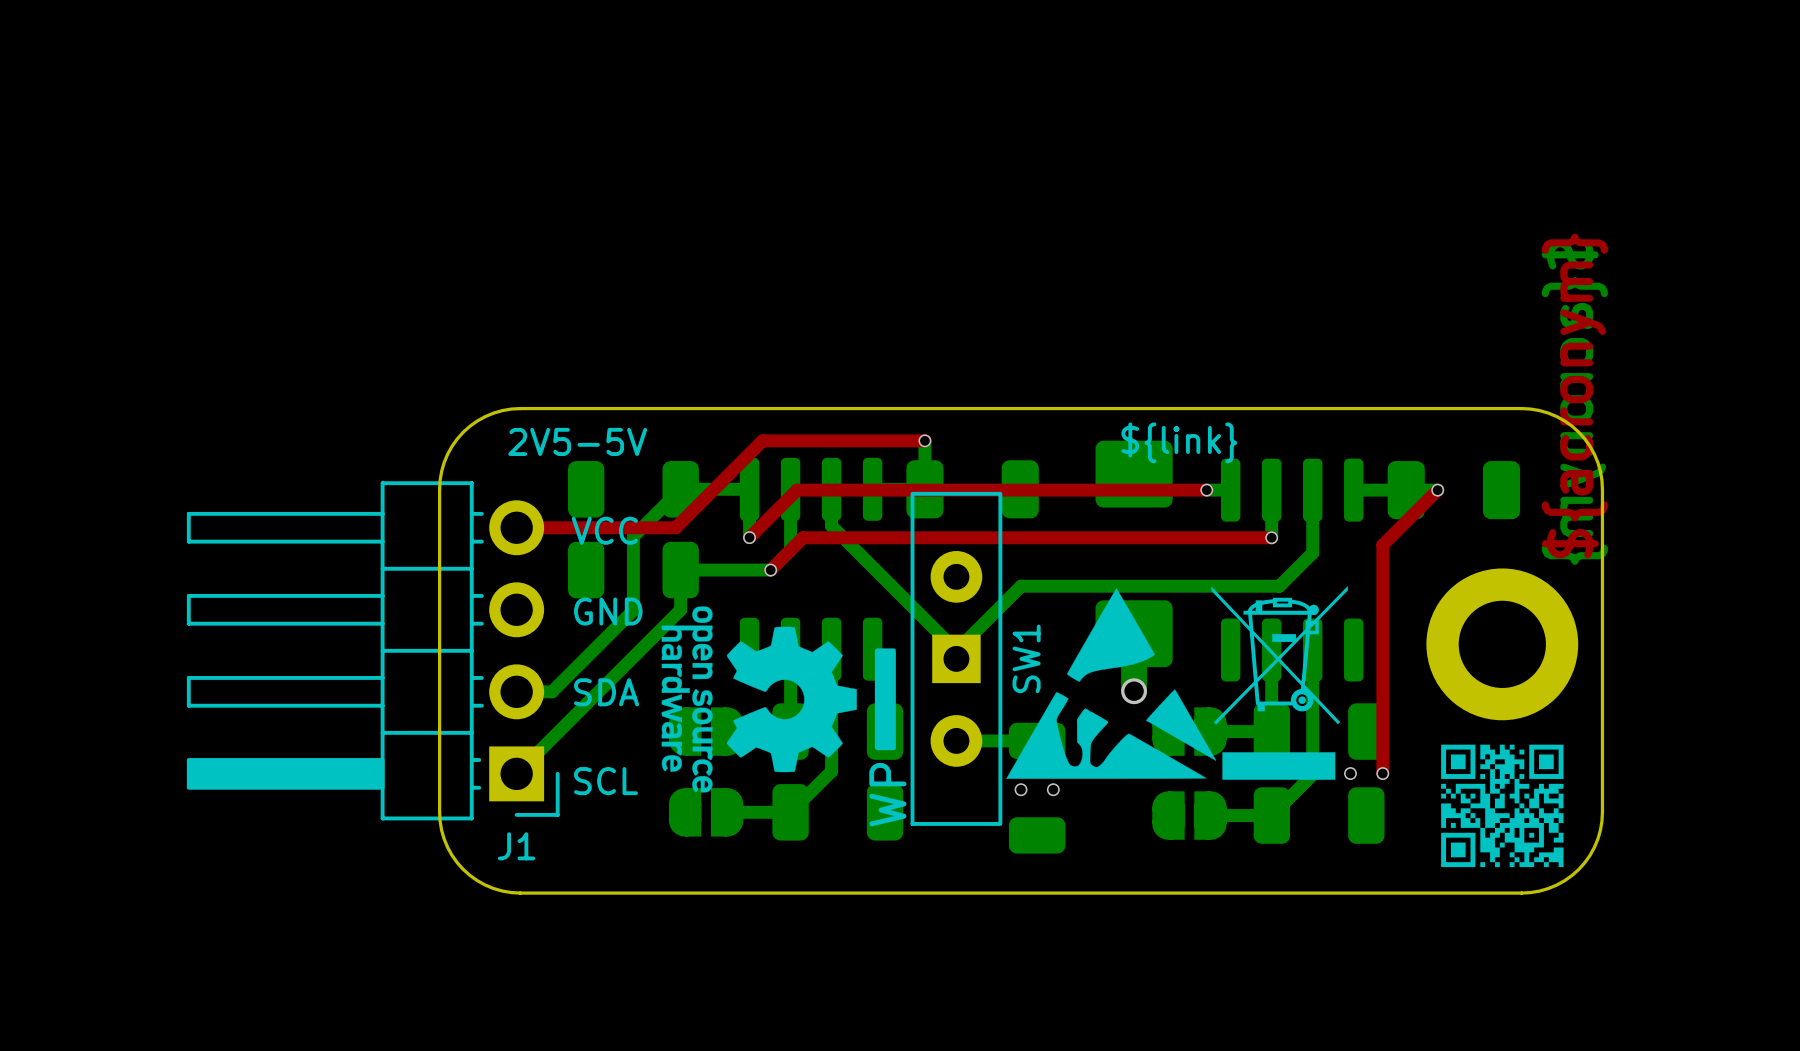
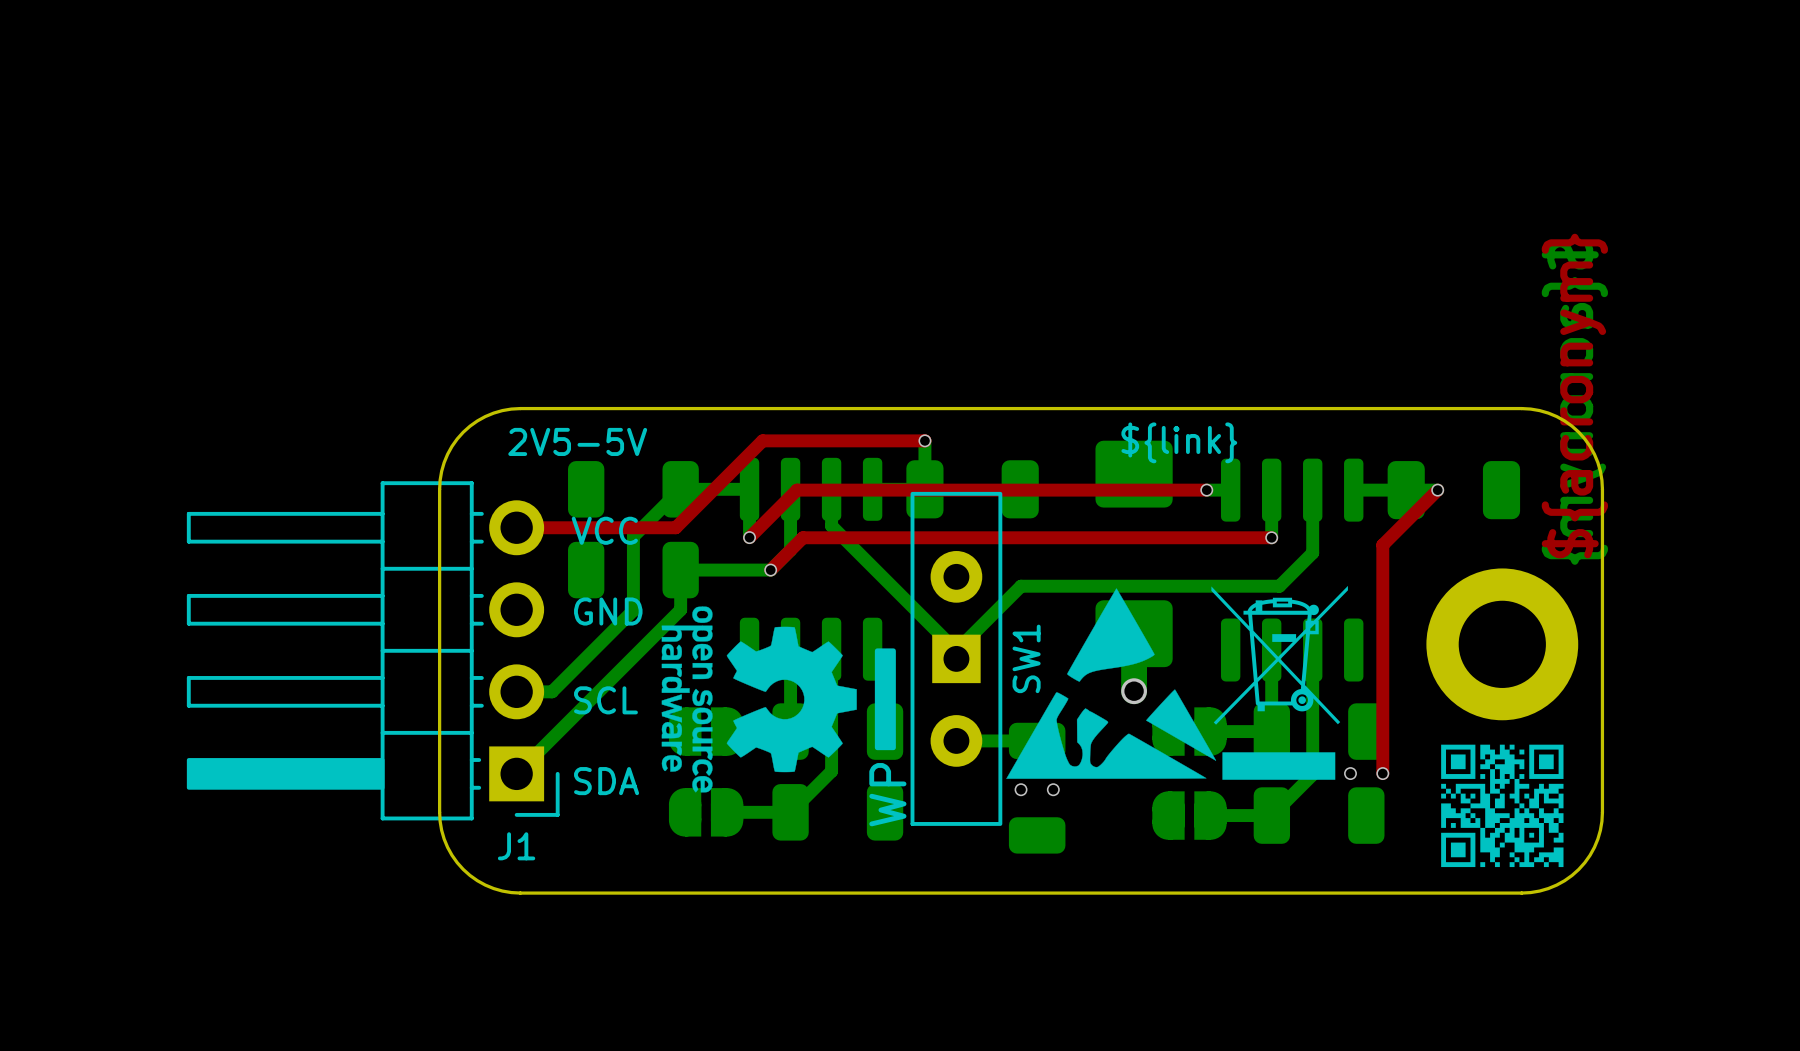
text: SDA (606, 692) -> SCL (605, 700)
text: SCL (605, 781) -> SDA (606, 781)

